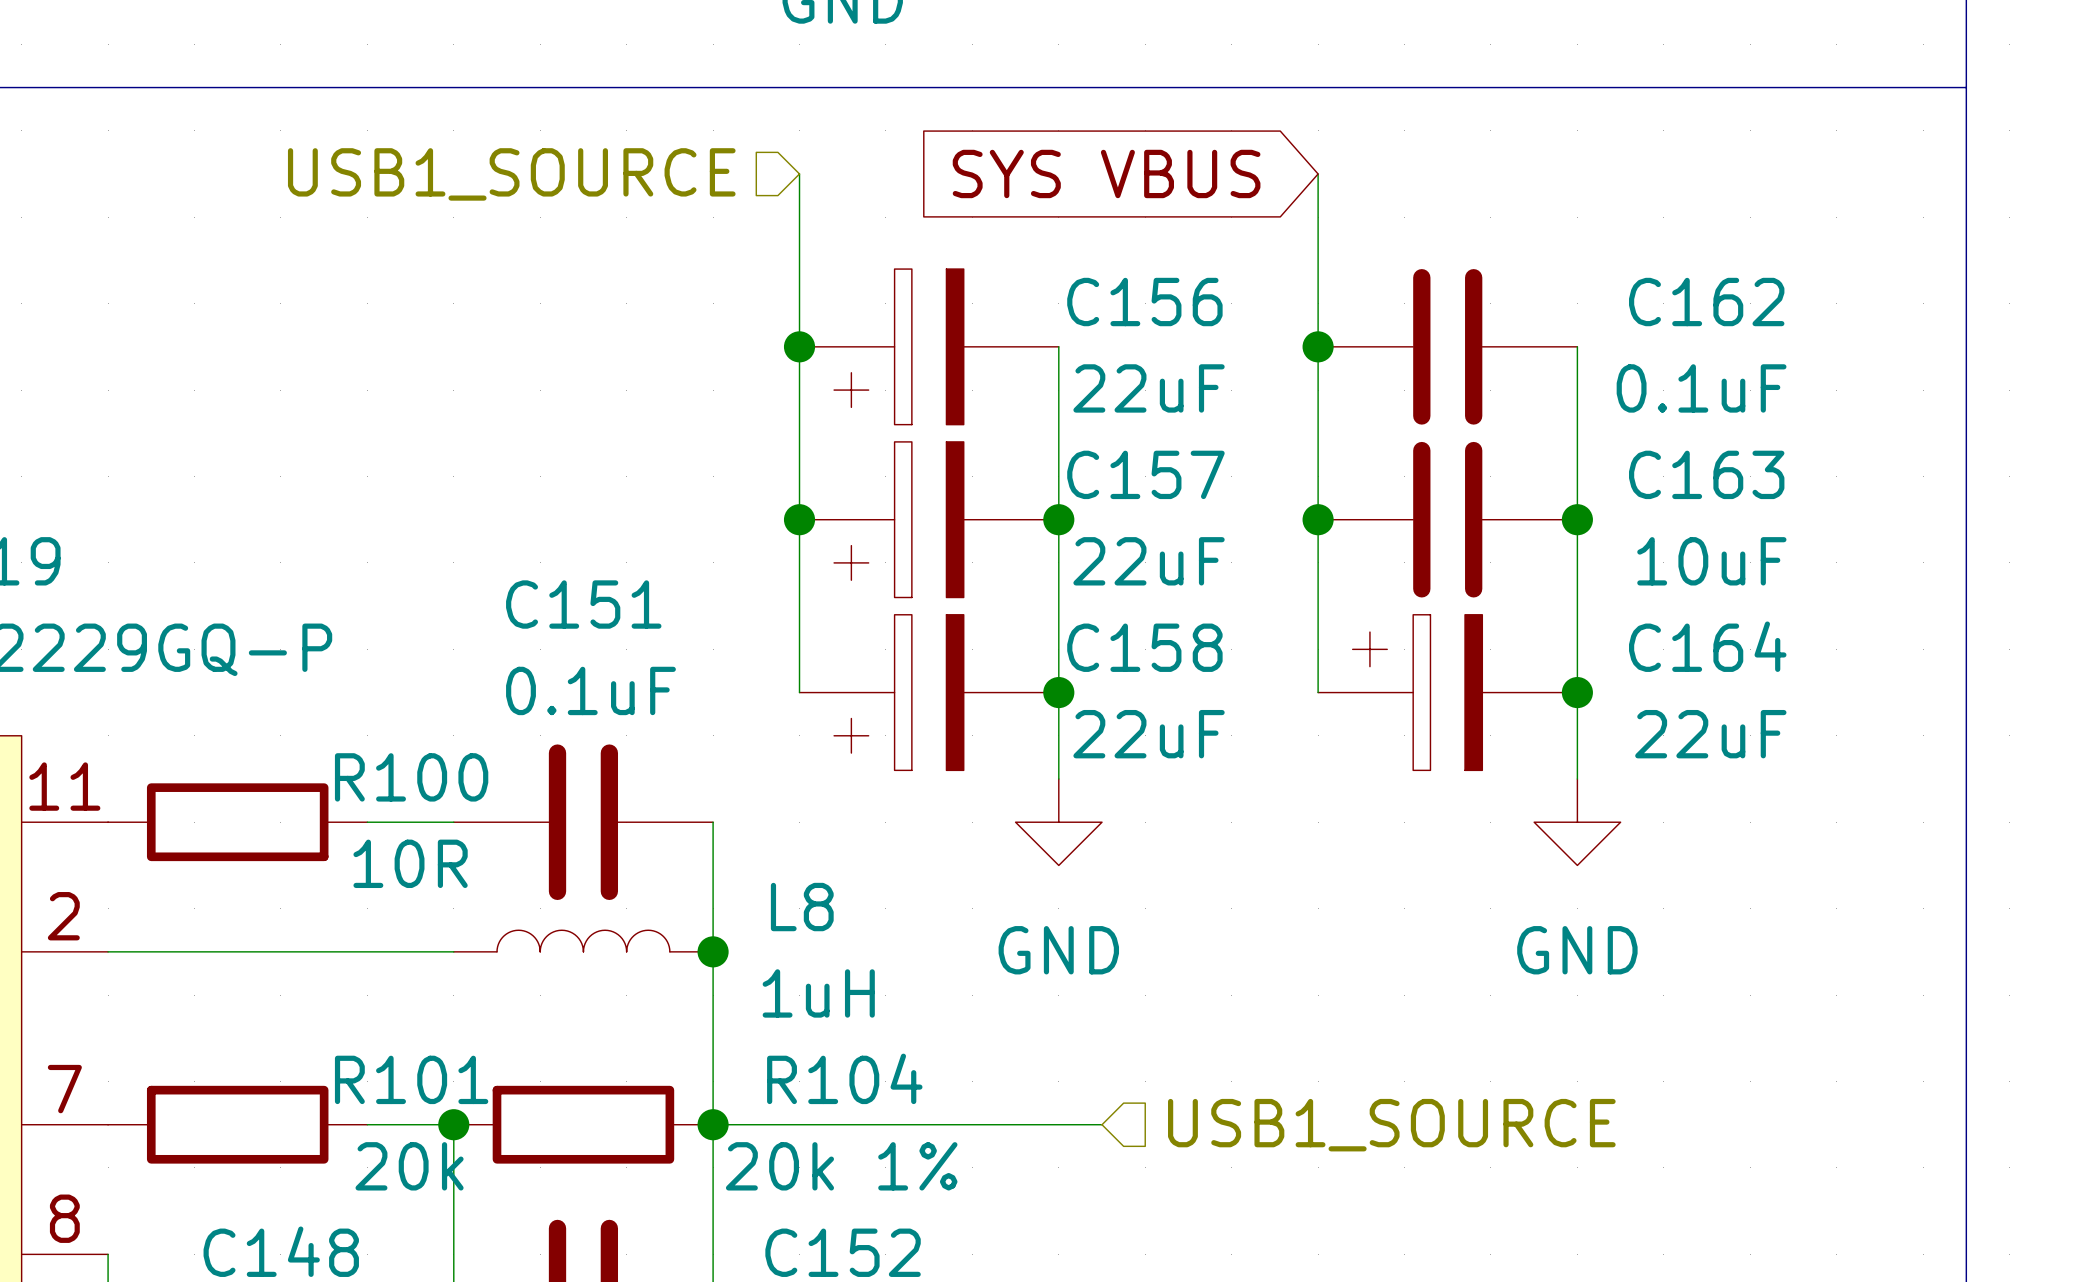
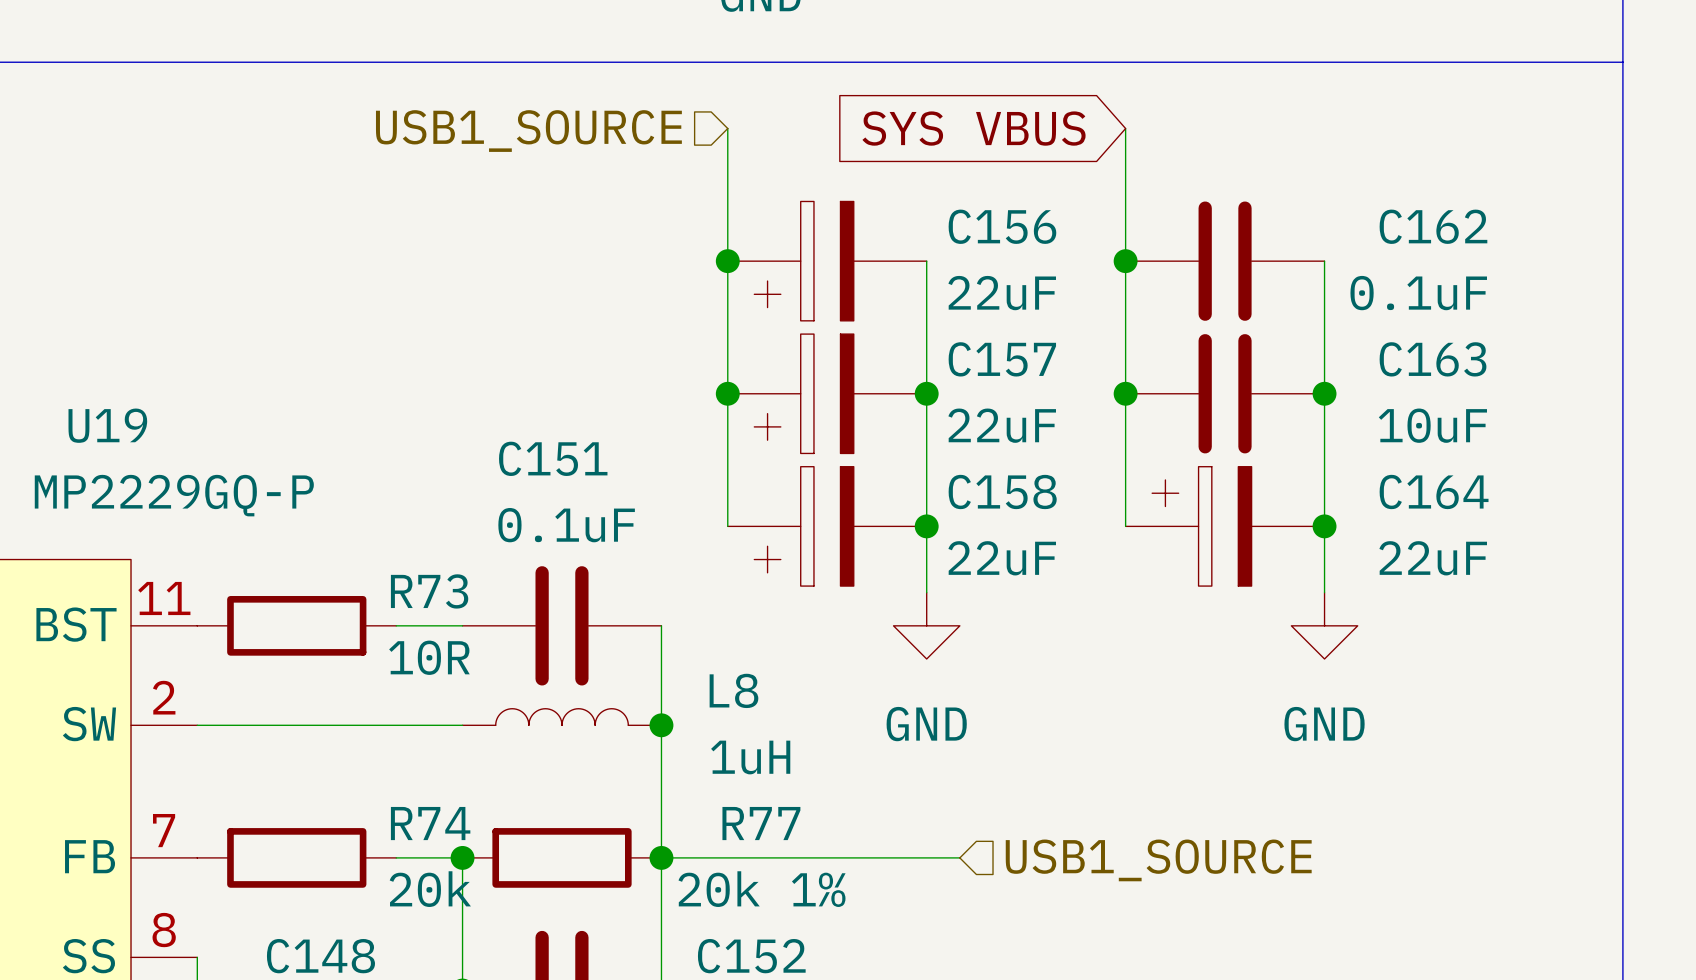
R100 name: R100 (411, 777) -> R73 (429, 591)
R104 name: R104 (844, 1078) -> R77 (761, 823)
R101 name: R101 (411, 1079) -> R74 (430, 823)

